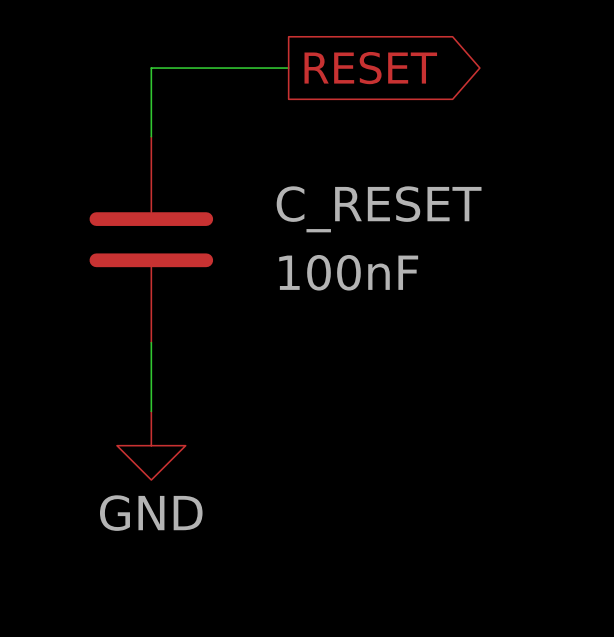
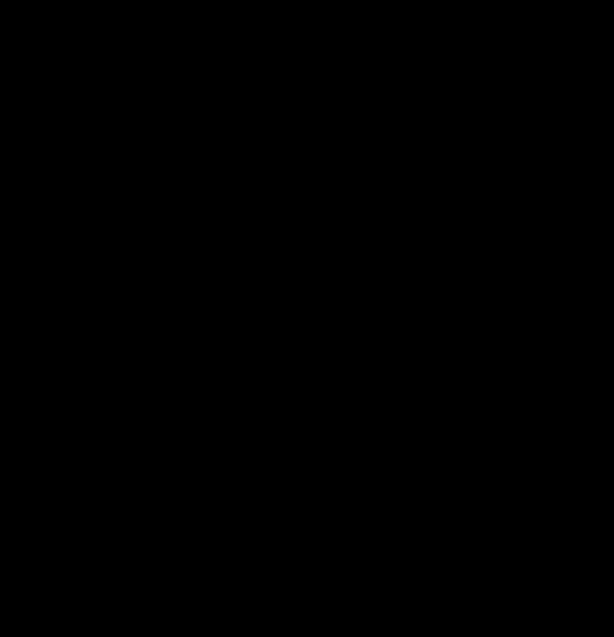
wire: (288, 68) (151, 68) (151, 136) -> none
global label: RESET (370, 68) -> none
C_RESET: 100nF (151, 239) -> none
wire: (151, 342) (151, 411) -> none
power symbol: GND (151, 445) -> none

